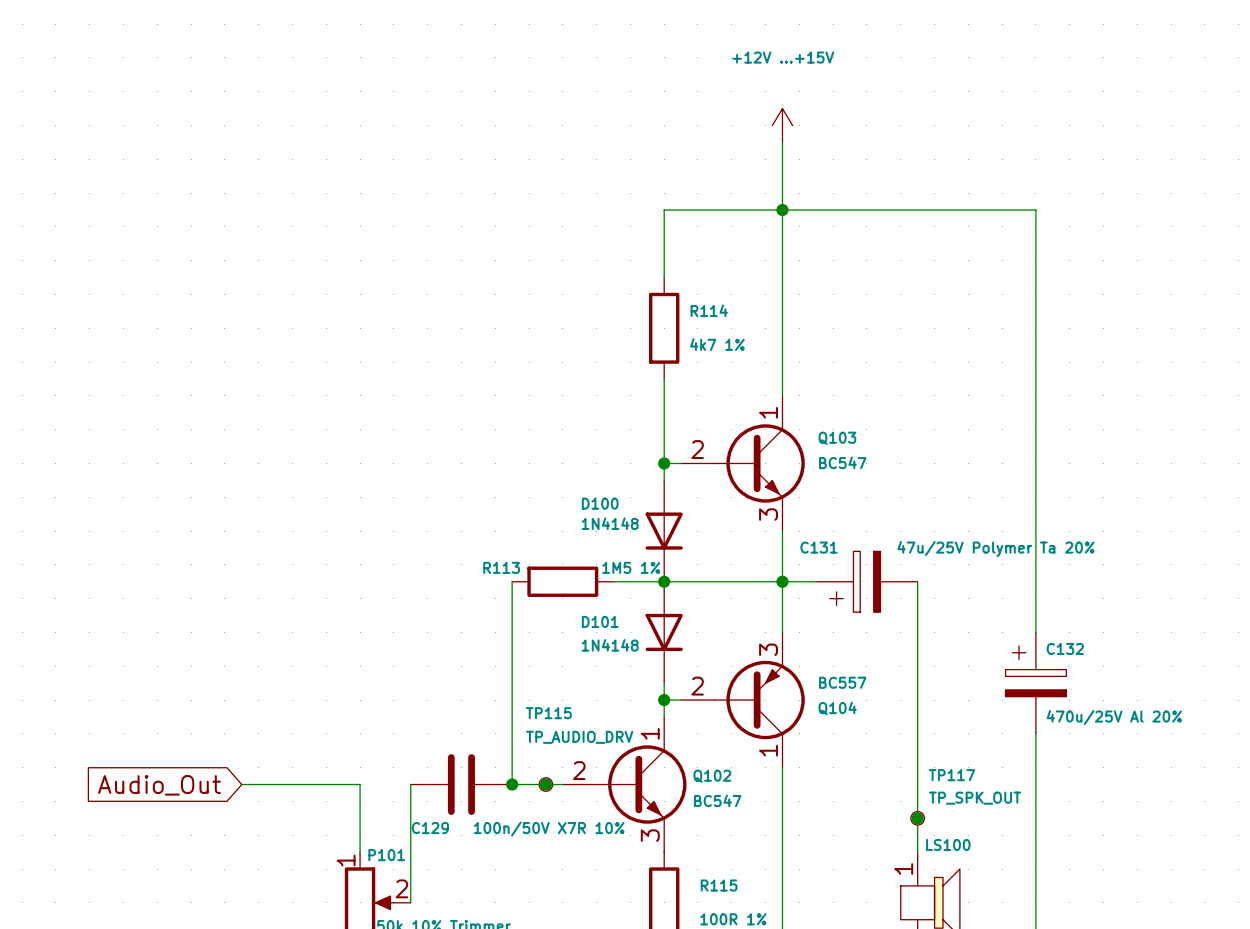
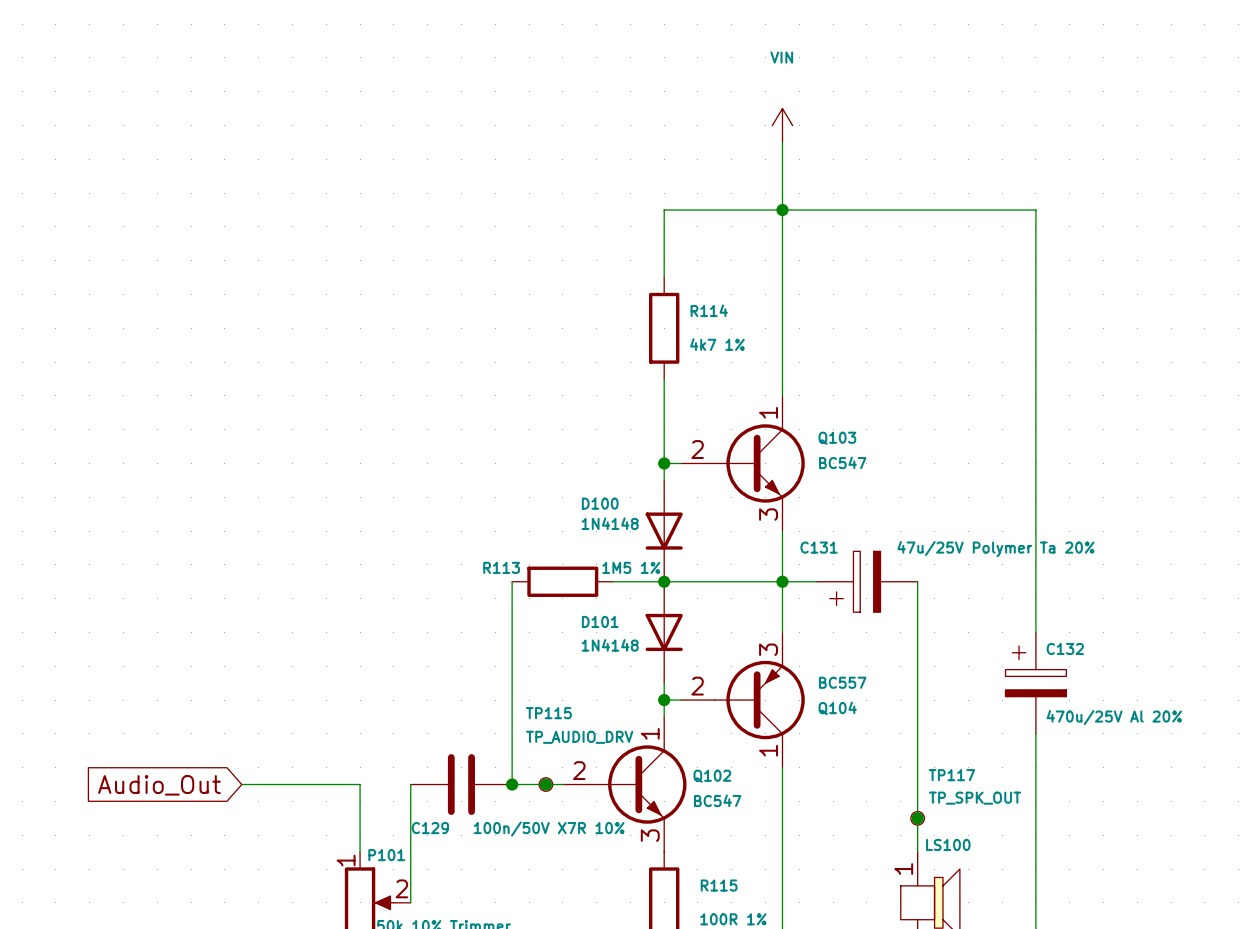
power symbol: +12V ...+15V (782, 125) -> VIN (782, 125)

